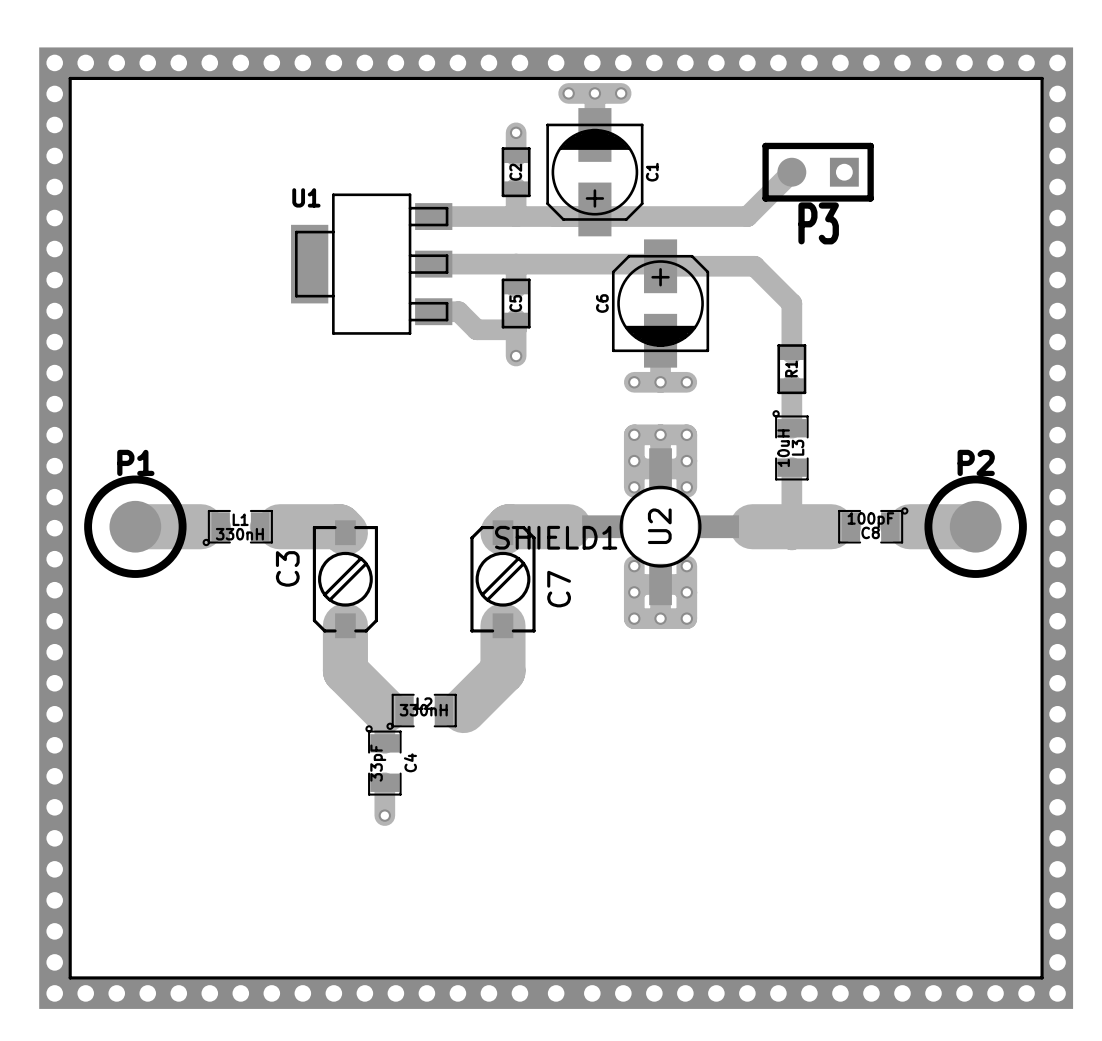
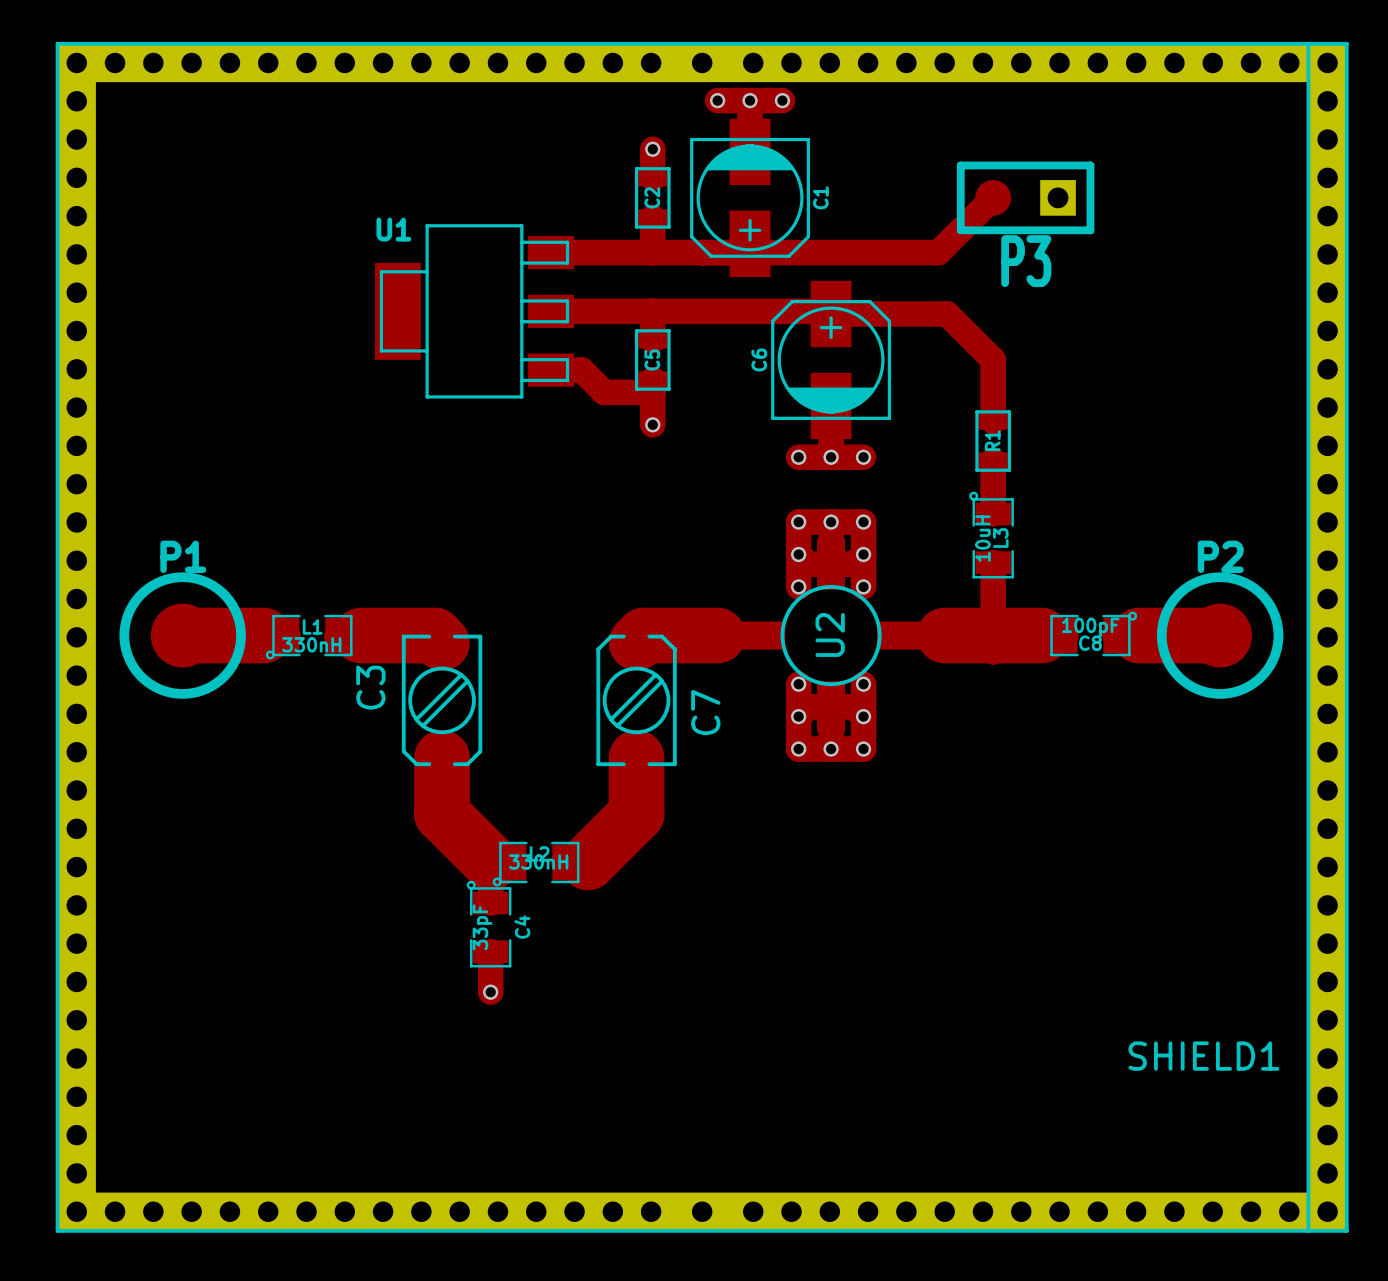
SHIELD1 footprint: [39, 47, 1074, 1009] -> [55, 41, 1349, 1233]
SHIELD1 name position: SHIELD1 (556, 537) -> SHIELD1 (1203, 1056)

